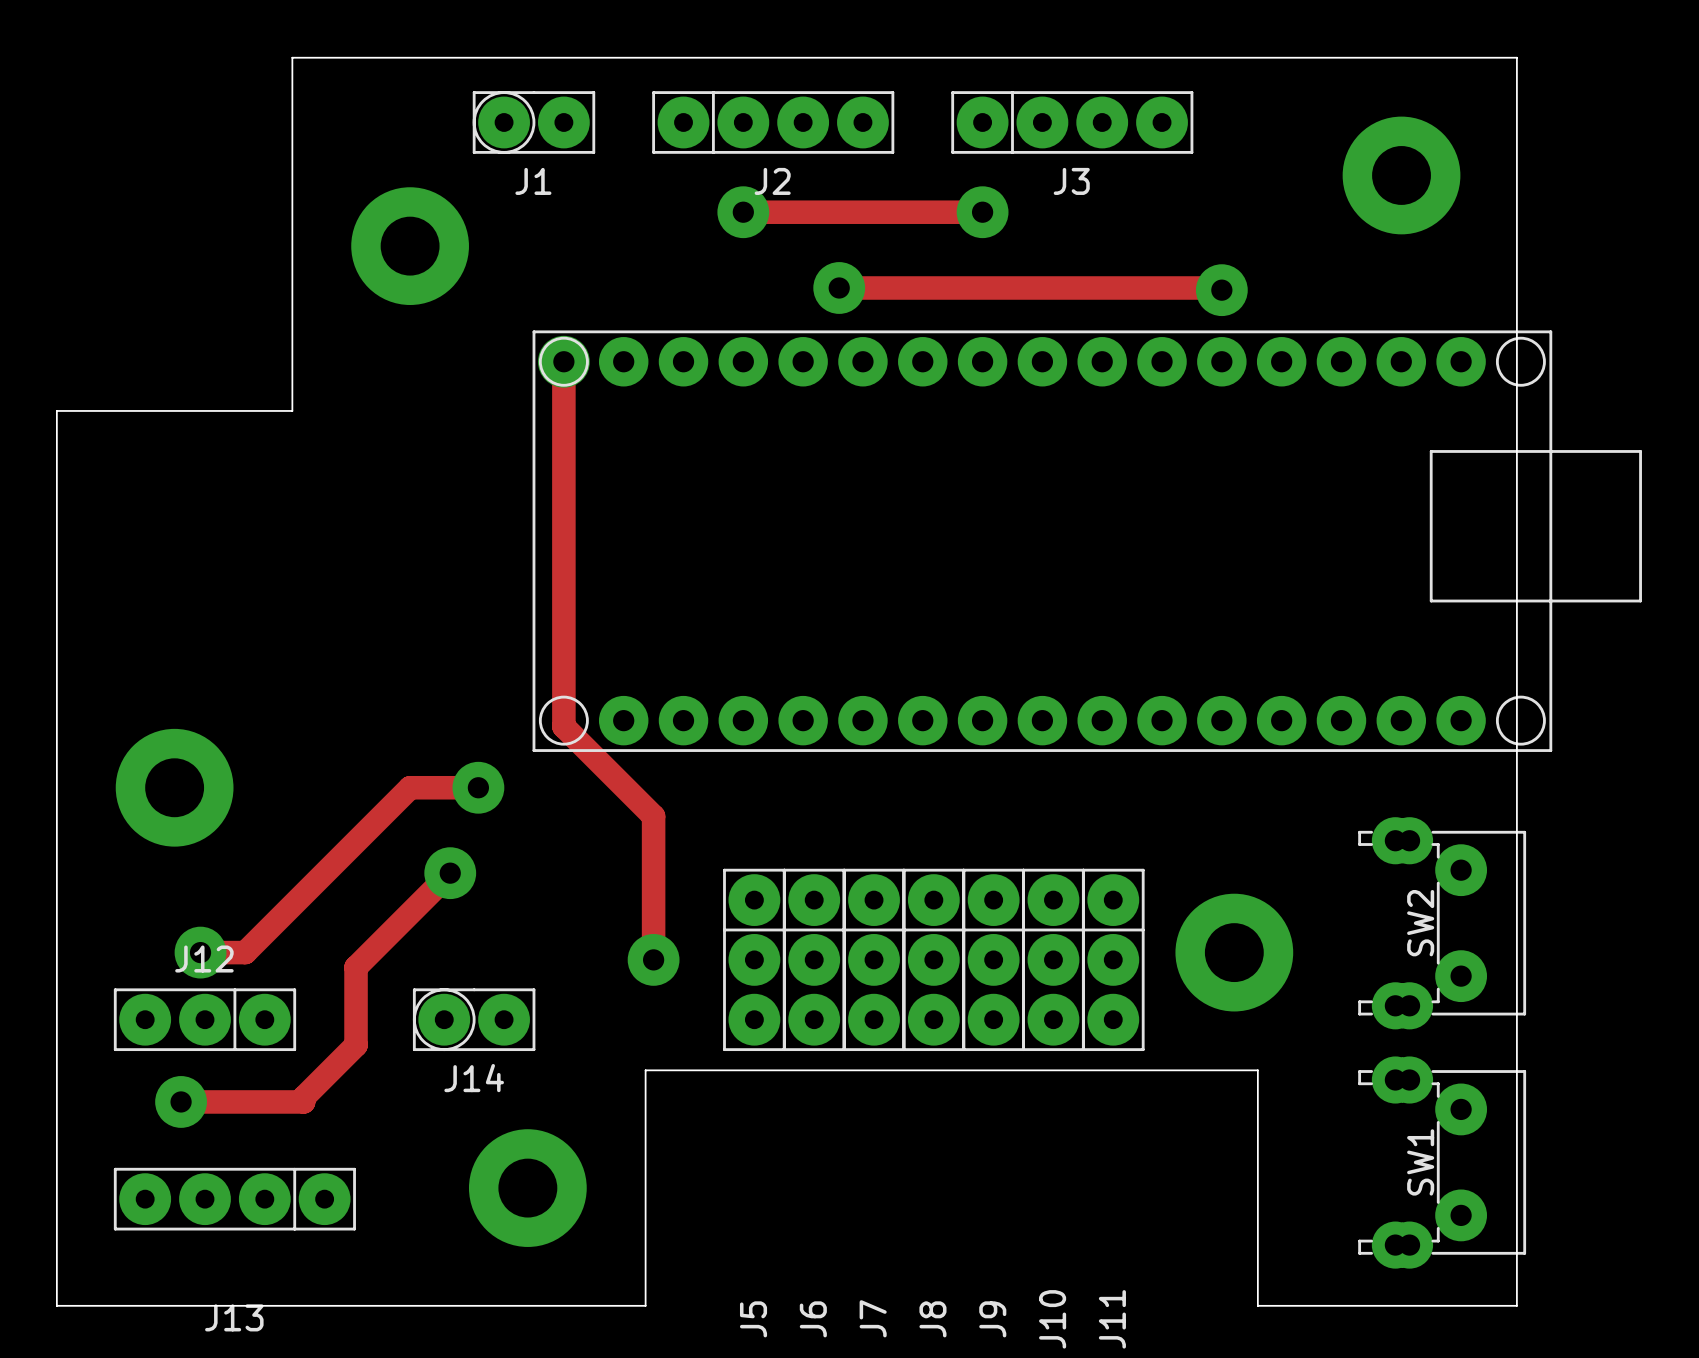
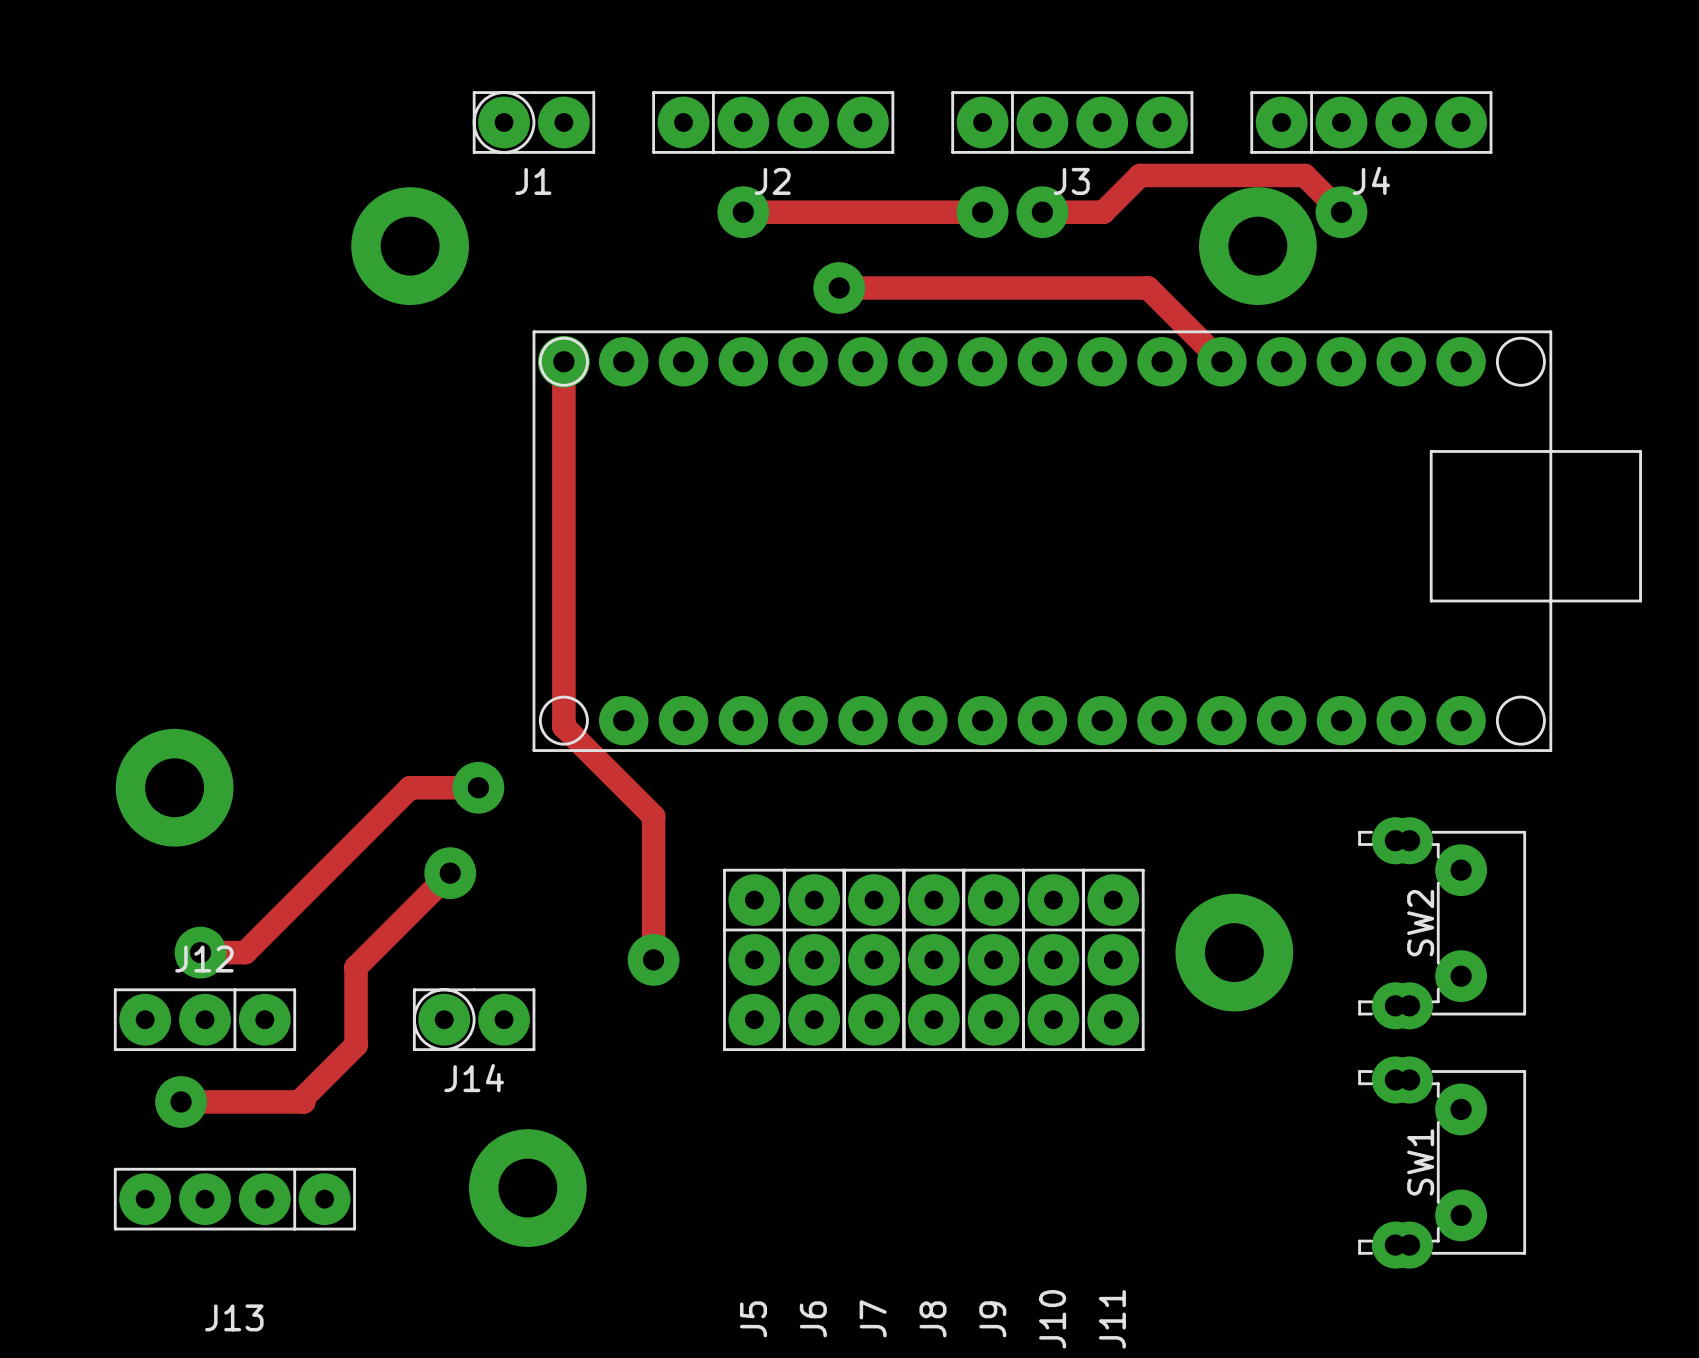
board edge: (292, 57) (1516, 57) (1516, 1305) (1257, 1305) (1257, 1070) (645, 1070) (645, 1305) (56, 1305) (56, 410) (292, 410) (292, 57) -> none
J4: none -> (1371, 122)
via: (1401, 175) -> none
track: none -> (1042, 212) (1103, 212) (1140, 175) (1304, 175) (1341, 212)
via: none -> (1042, 212)
via: none -> (1341, 212)
via: none -> (1257, 246)
track: (1148, 287) (1219, 287) (1221, 290) -> (1148, 287) (1221, 361)
via: (1221, 290) -> none

